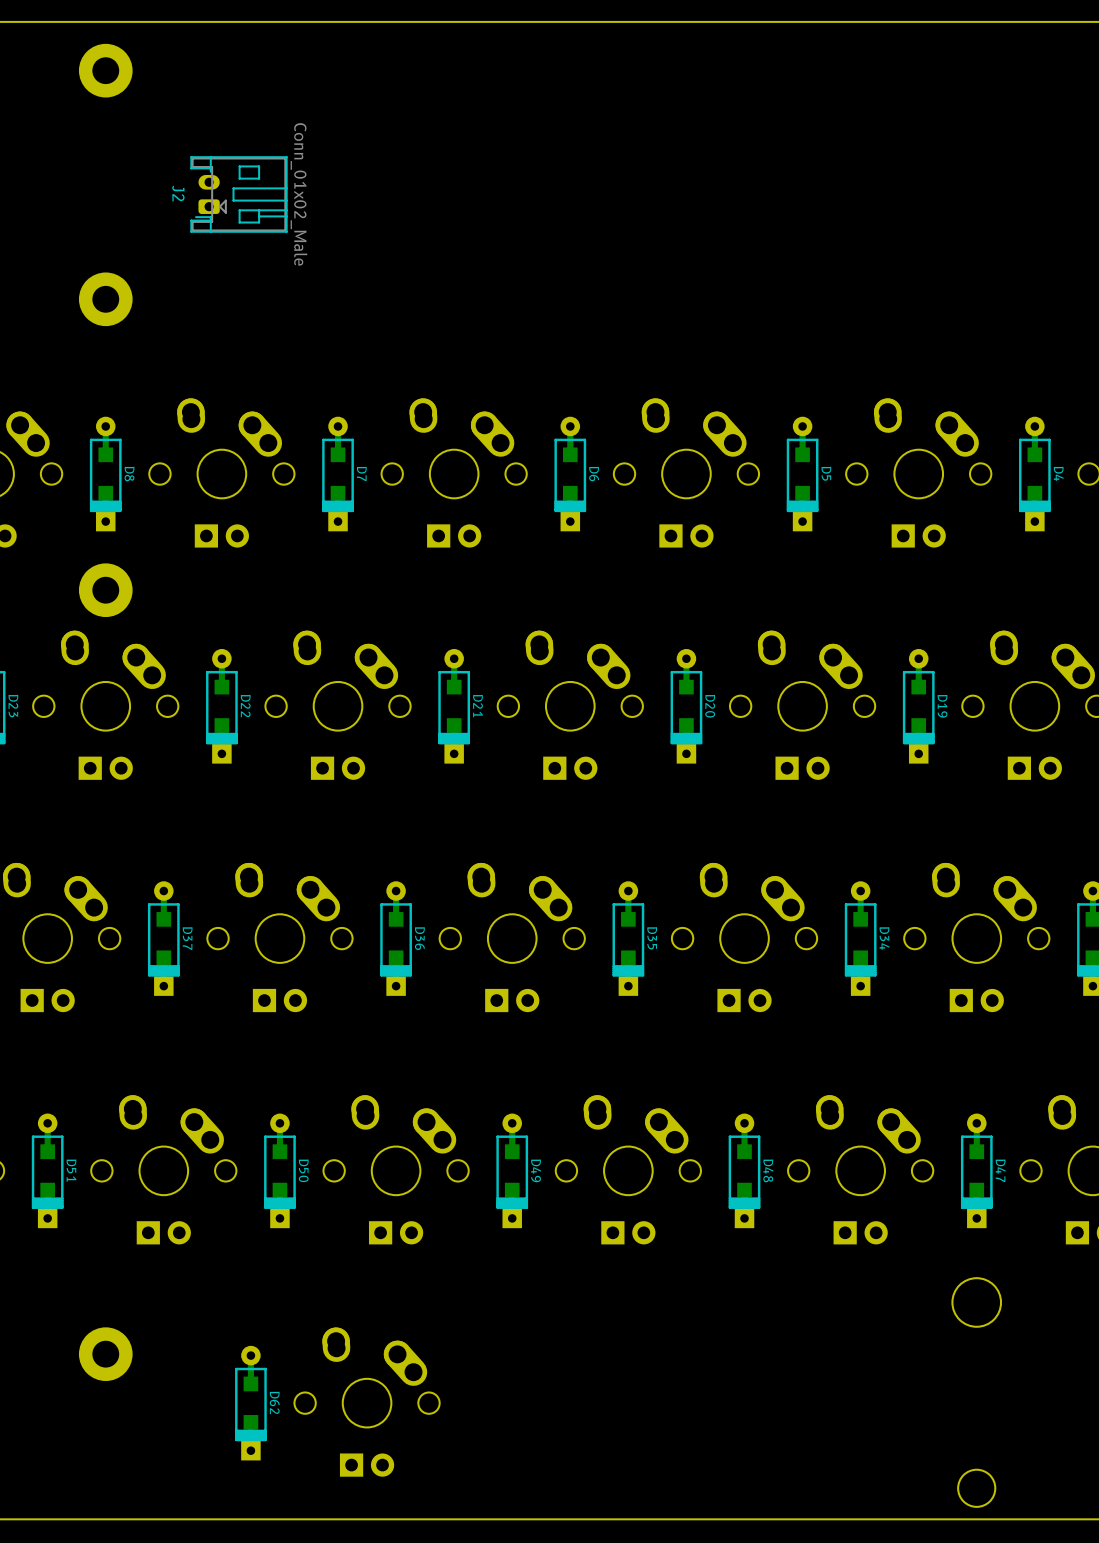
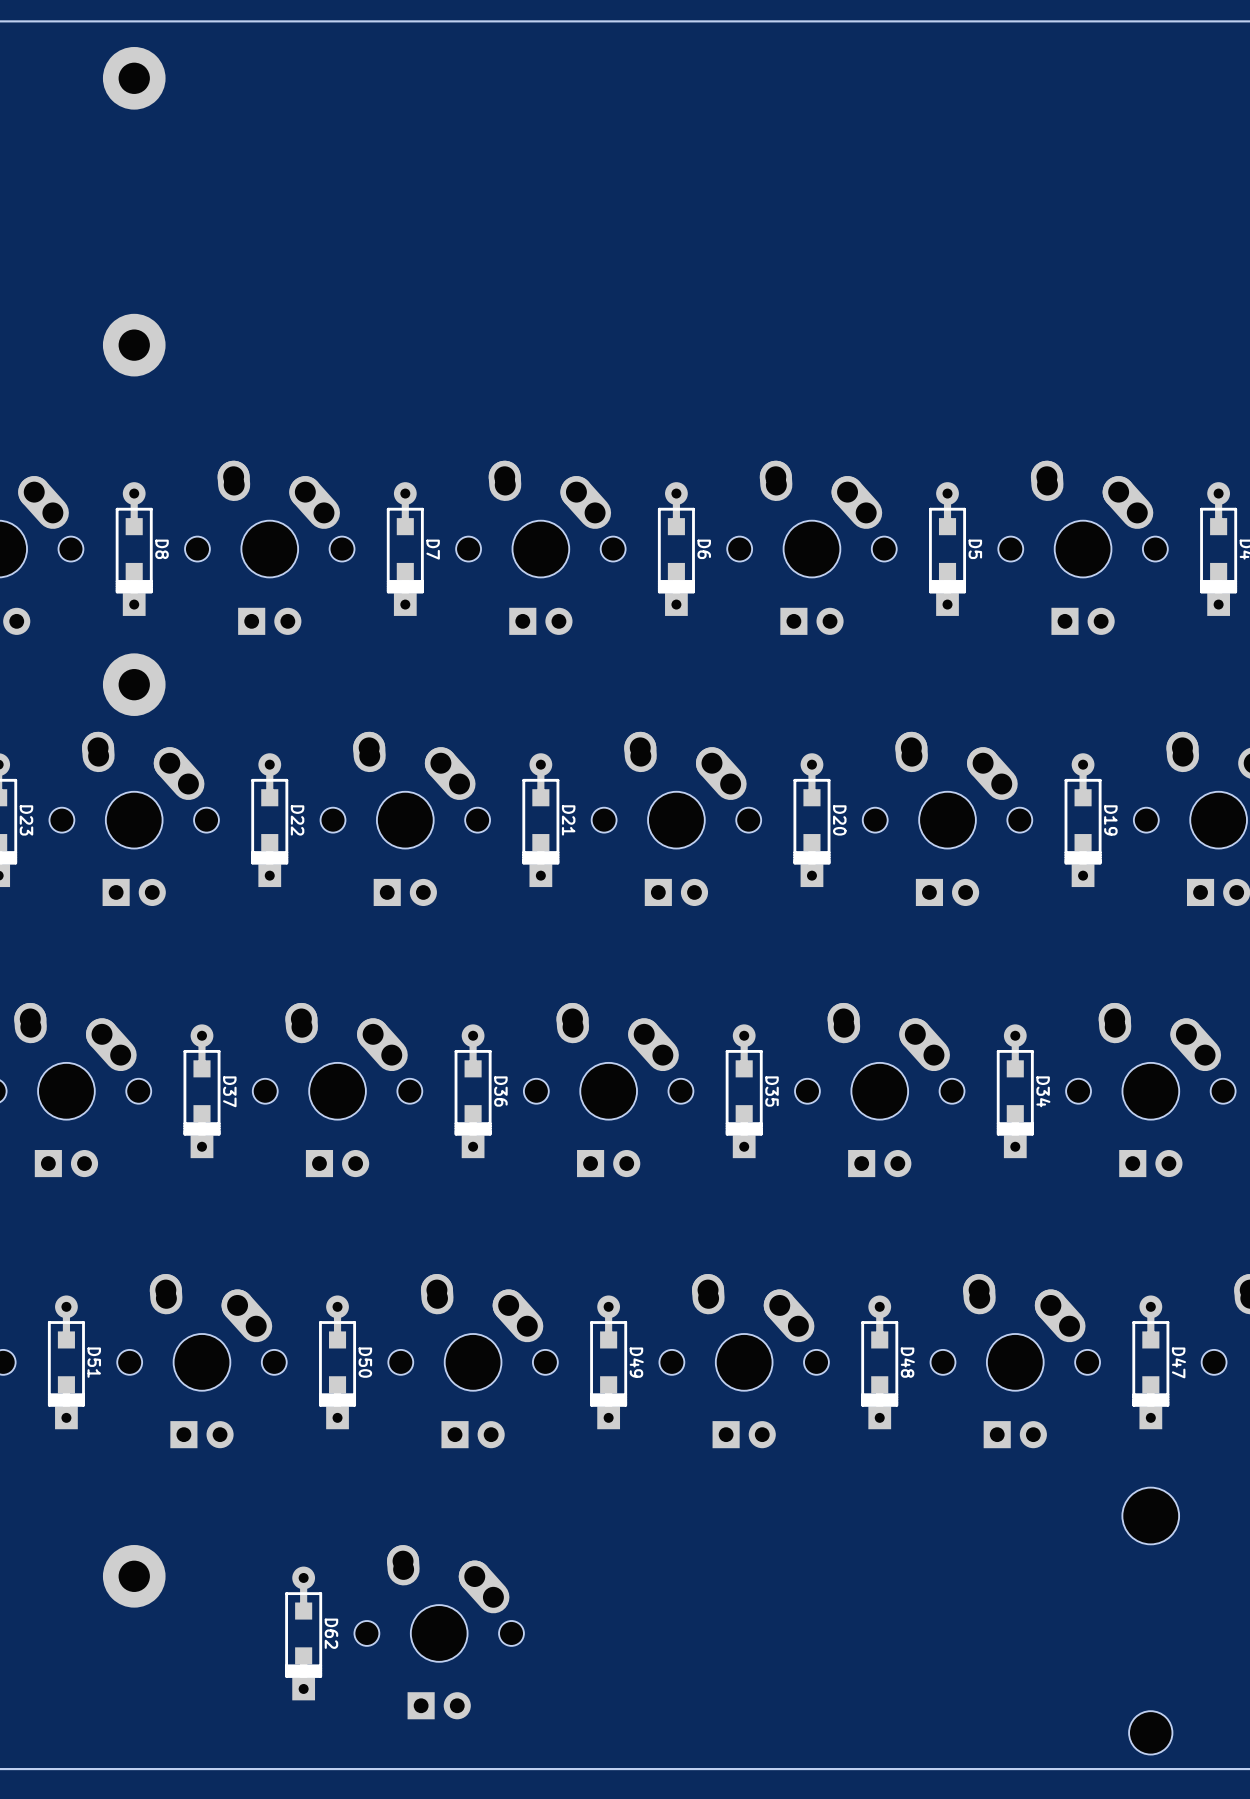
J2: Conn_01x02_Male (238, 194) -> none

